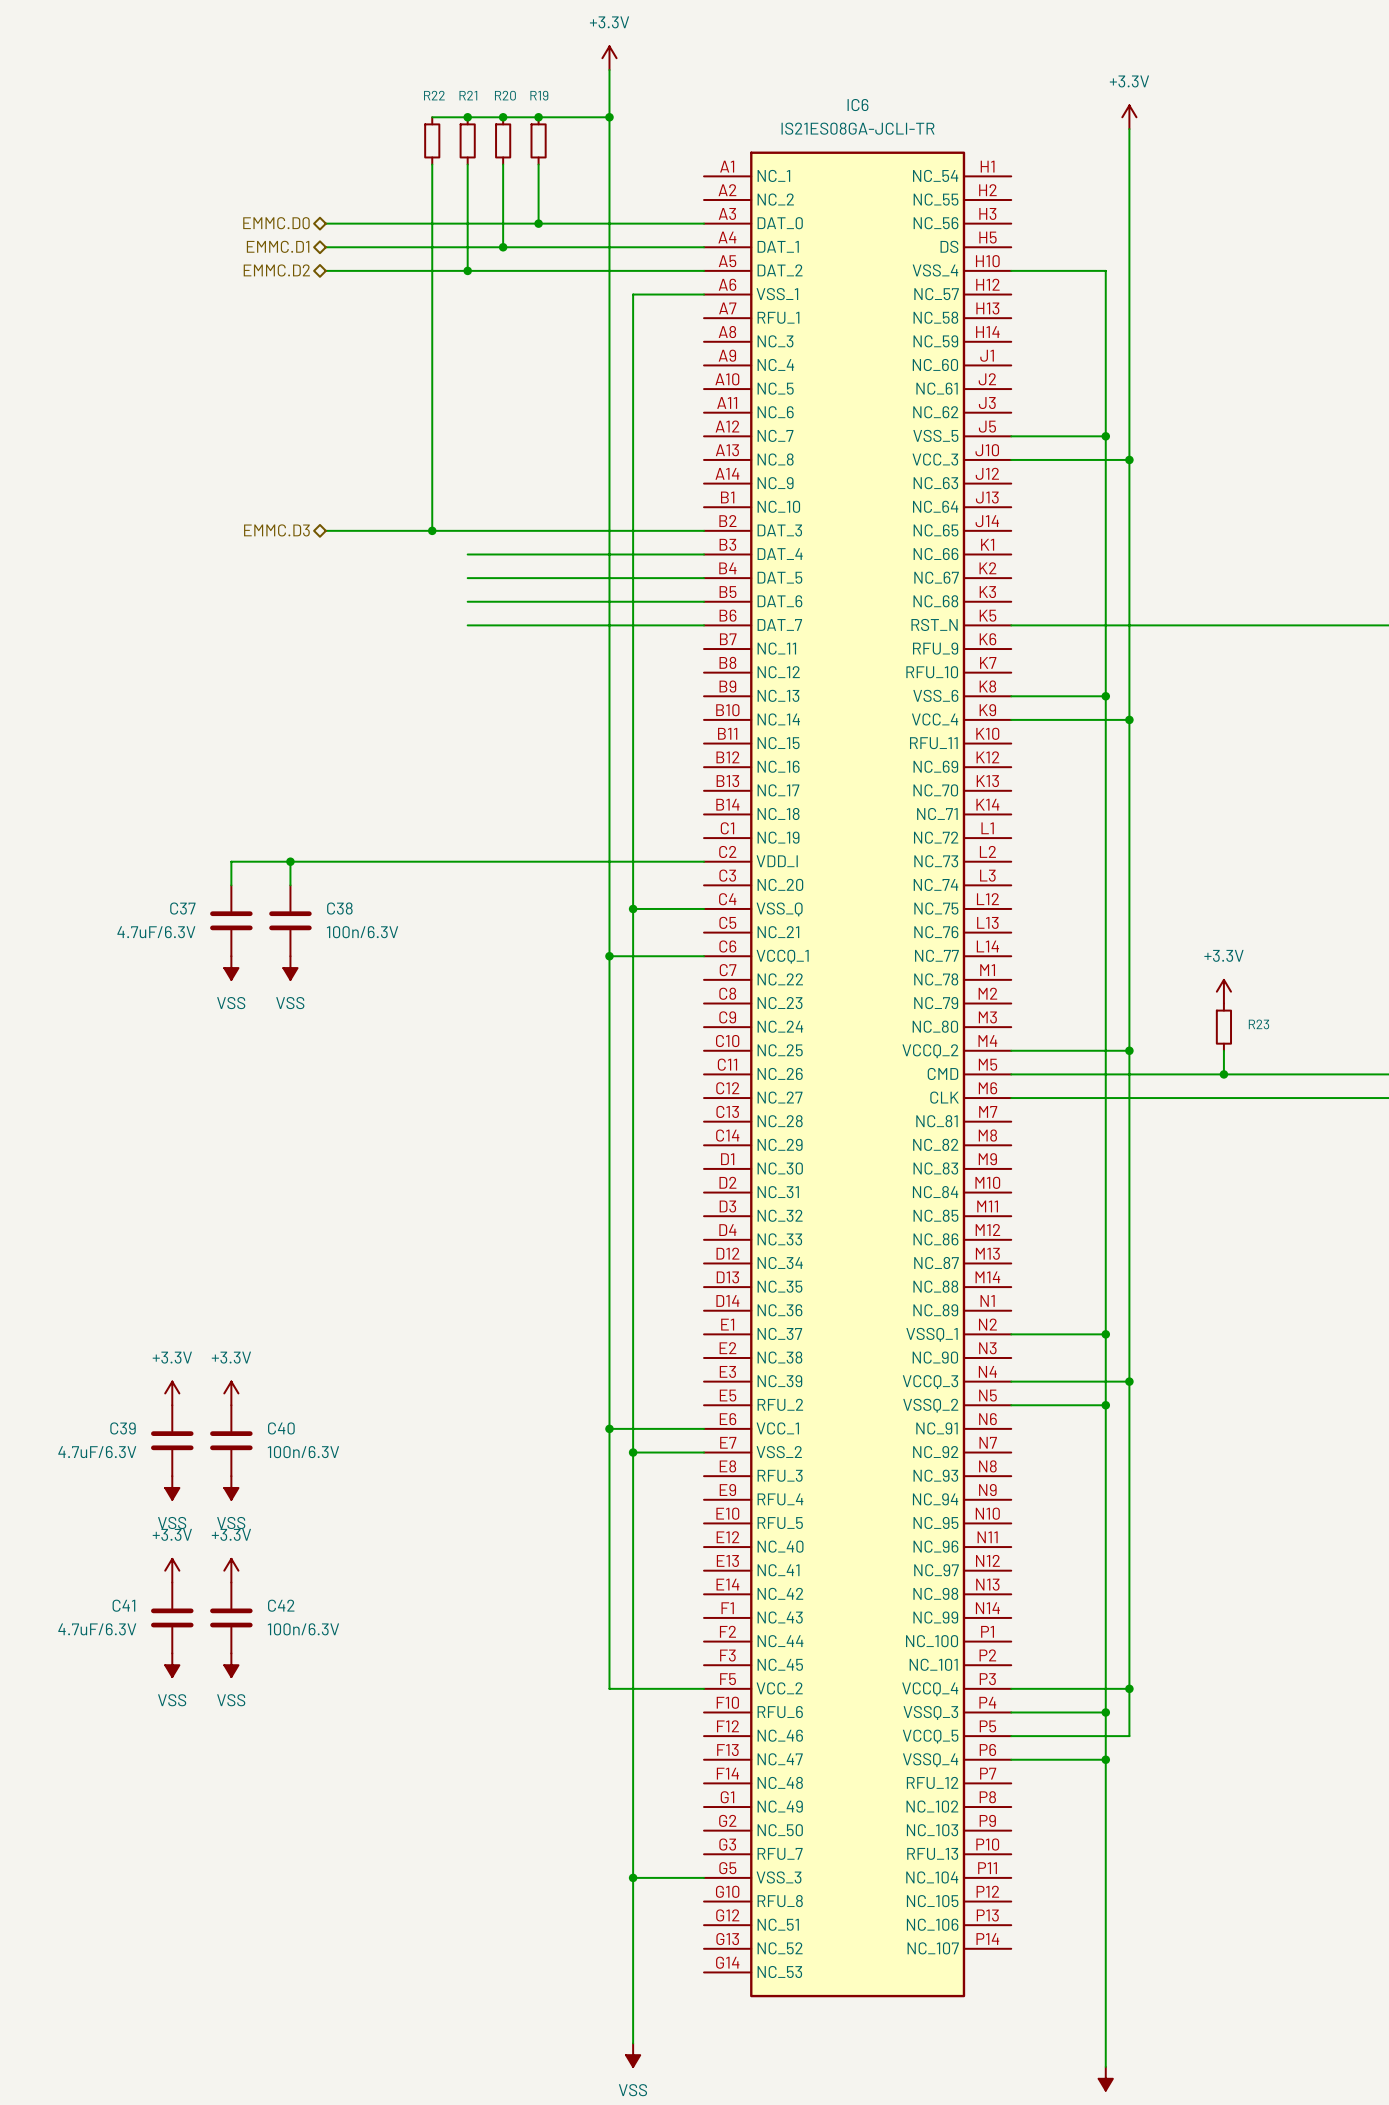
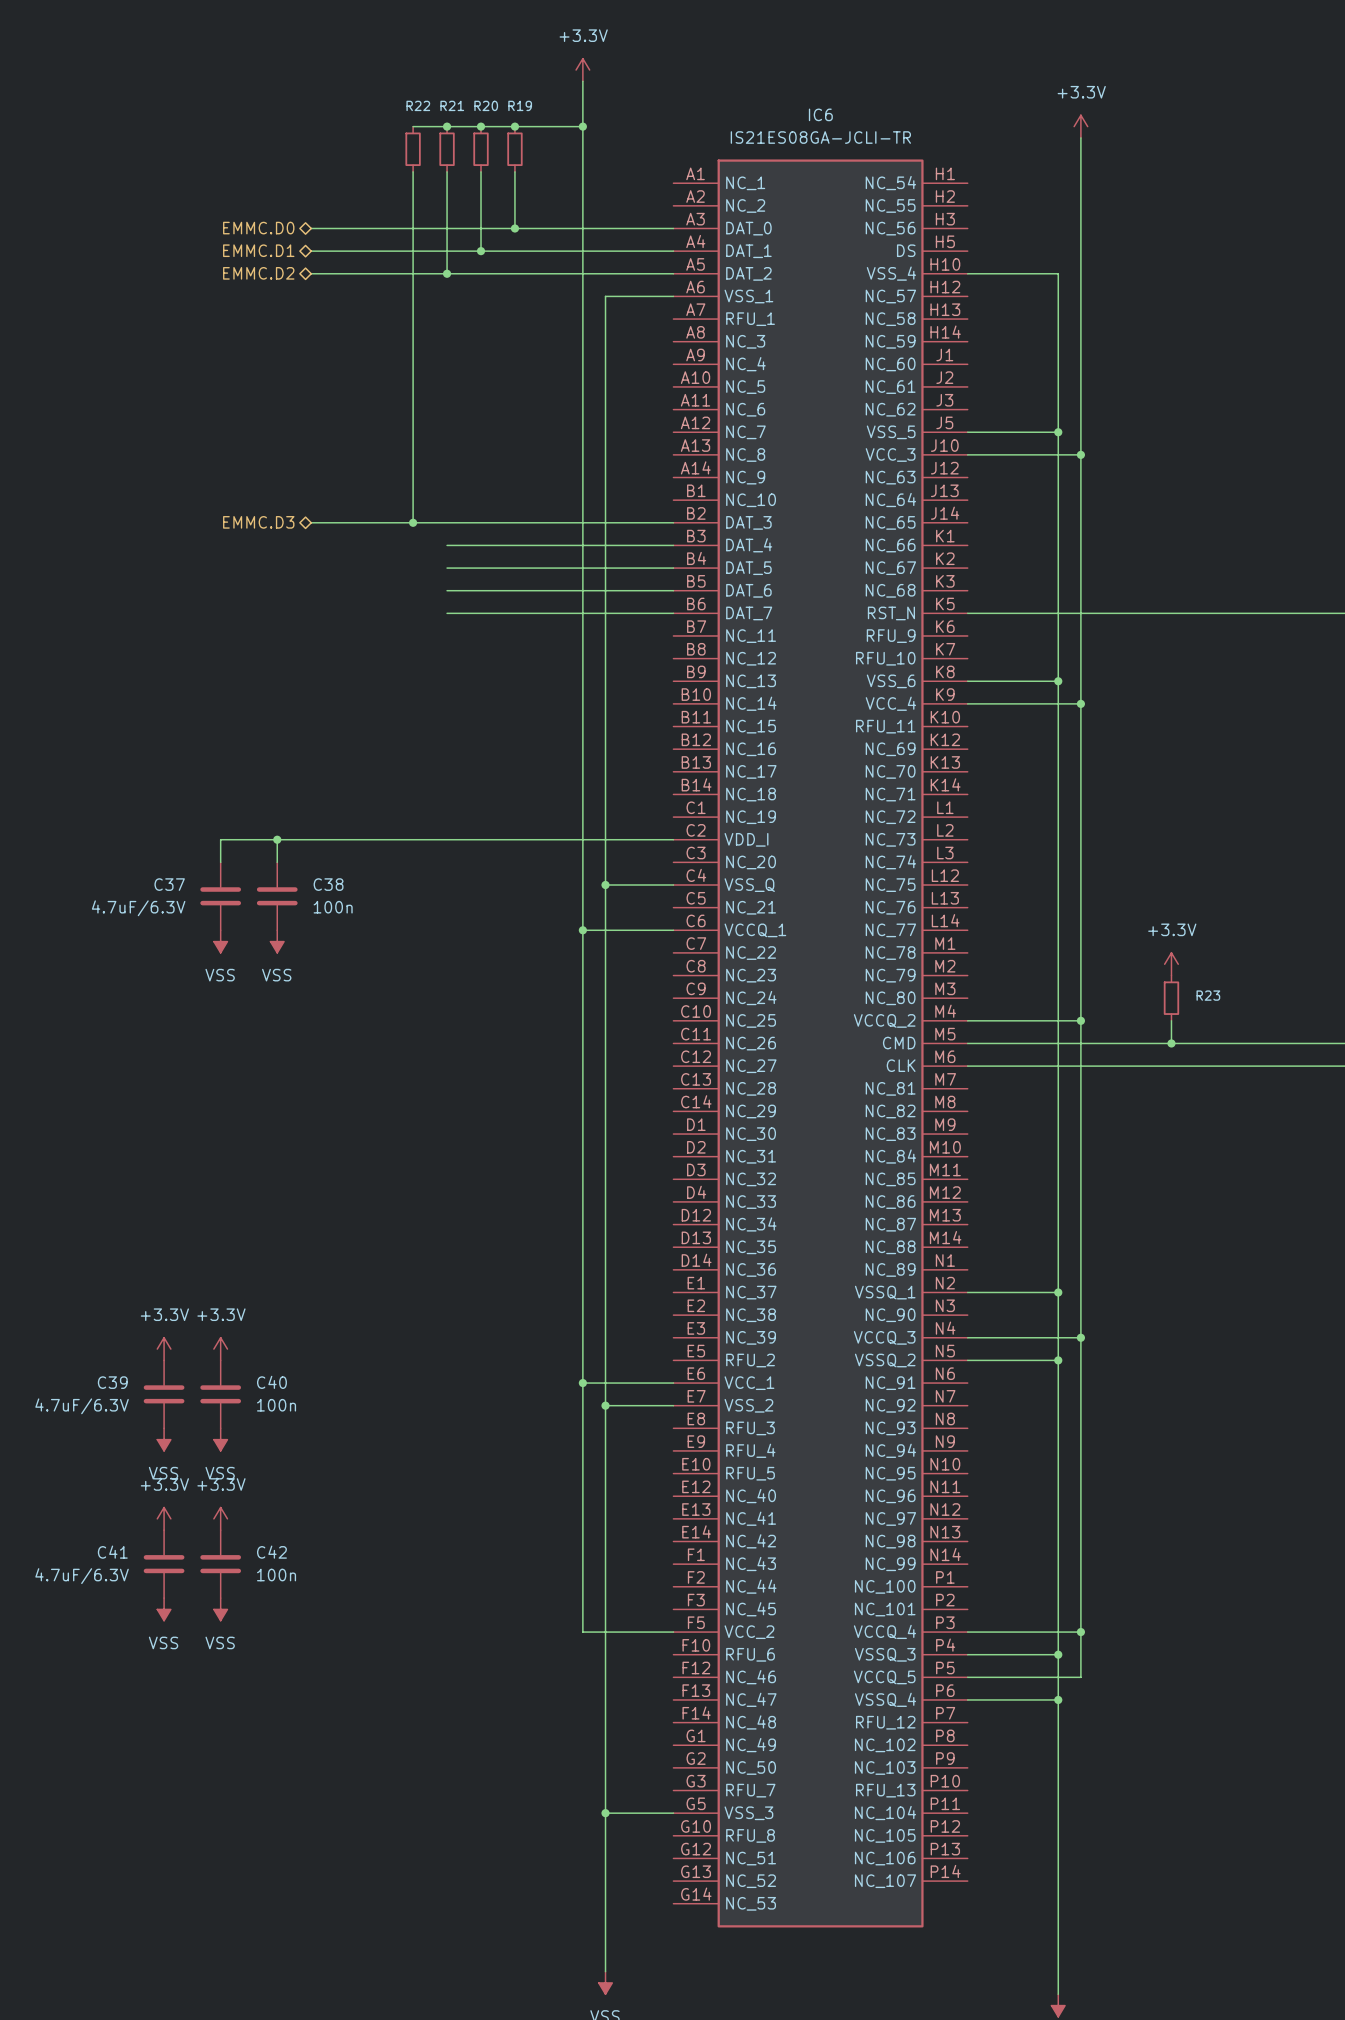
C38 value: 100n/6.3V (362, 932) -> 100n (333, 907)
C40 value: 100n/6.3V (303, 1452) -> 100n (276, 1405)
C42 value: 100n/6.3V (303, 1629) -> 100n (276, 1575)

